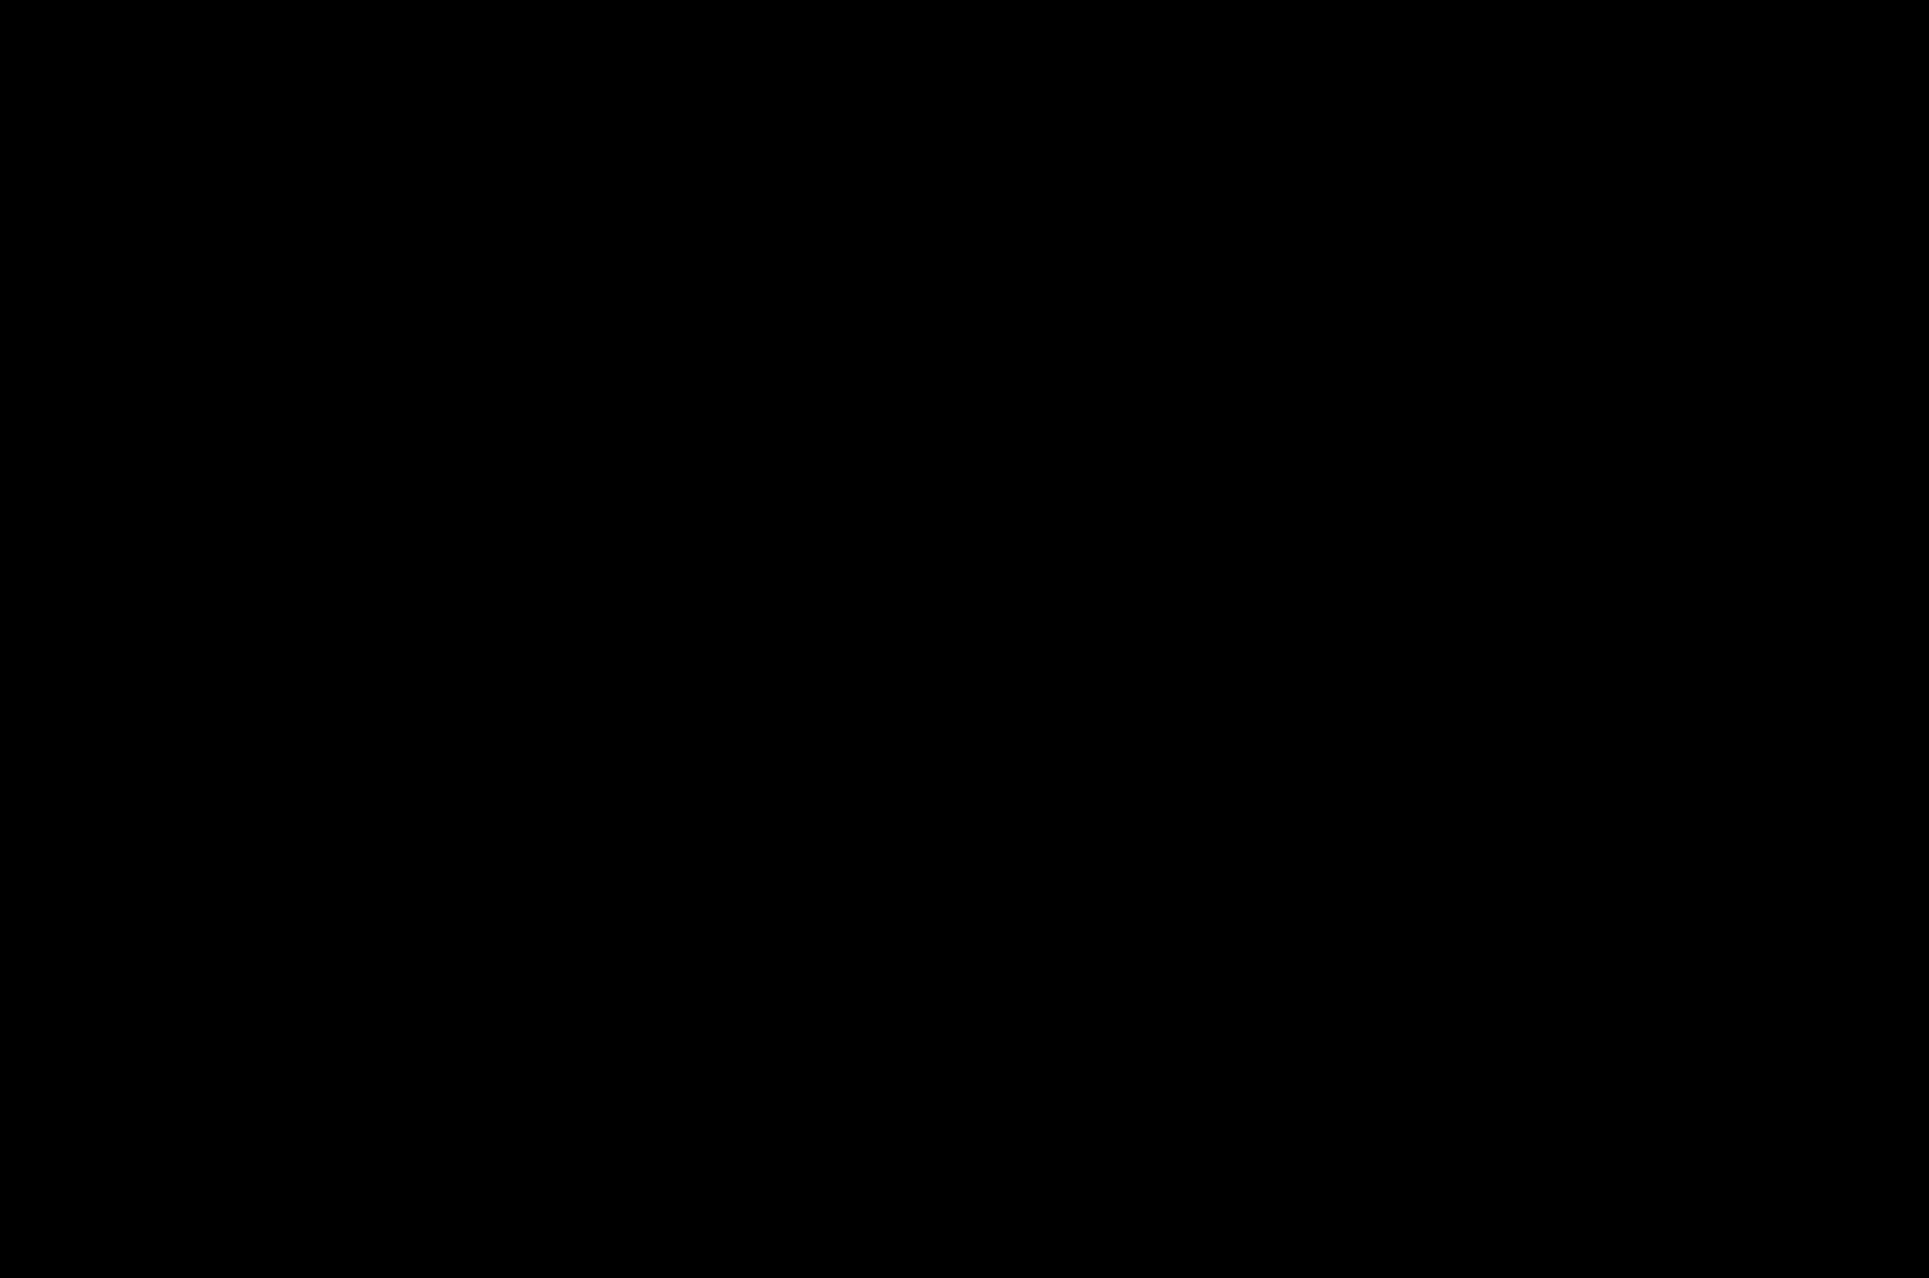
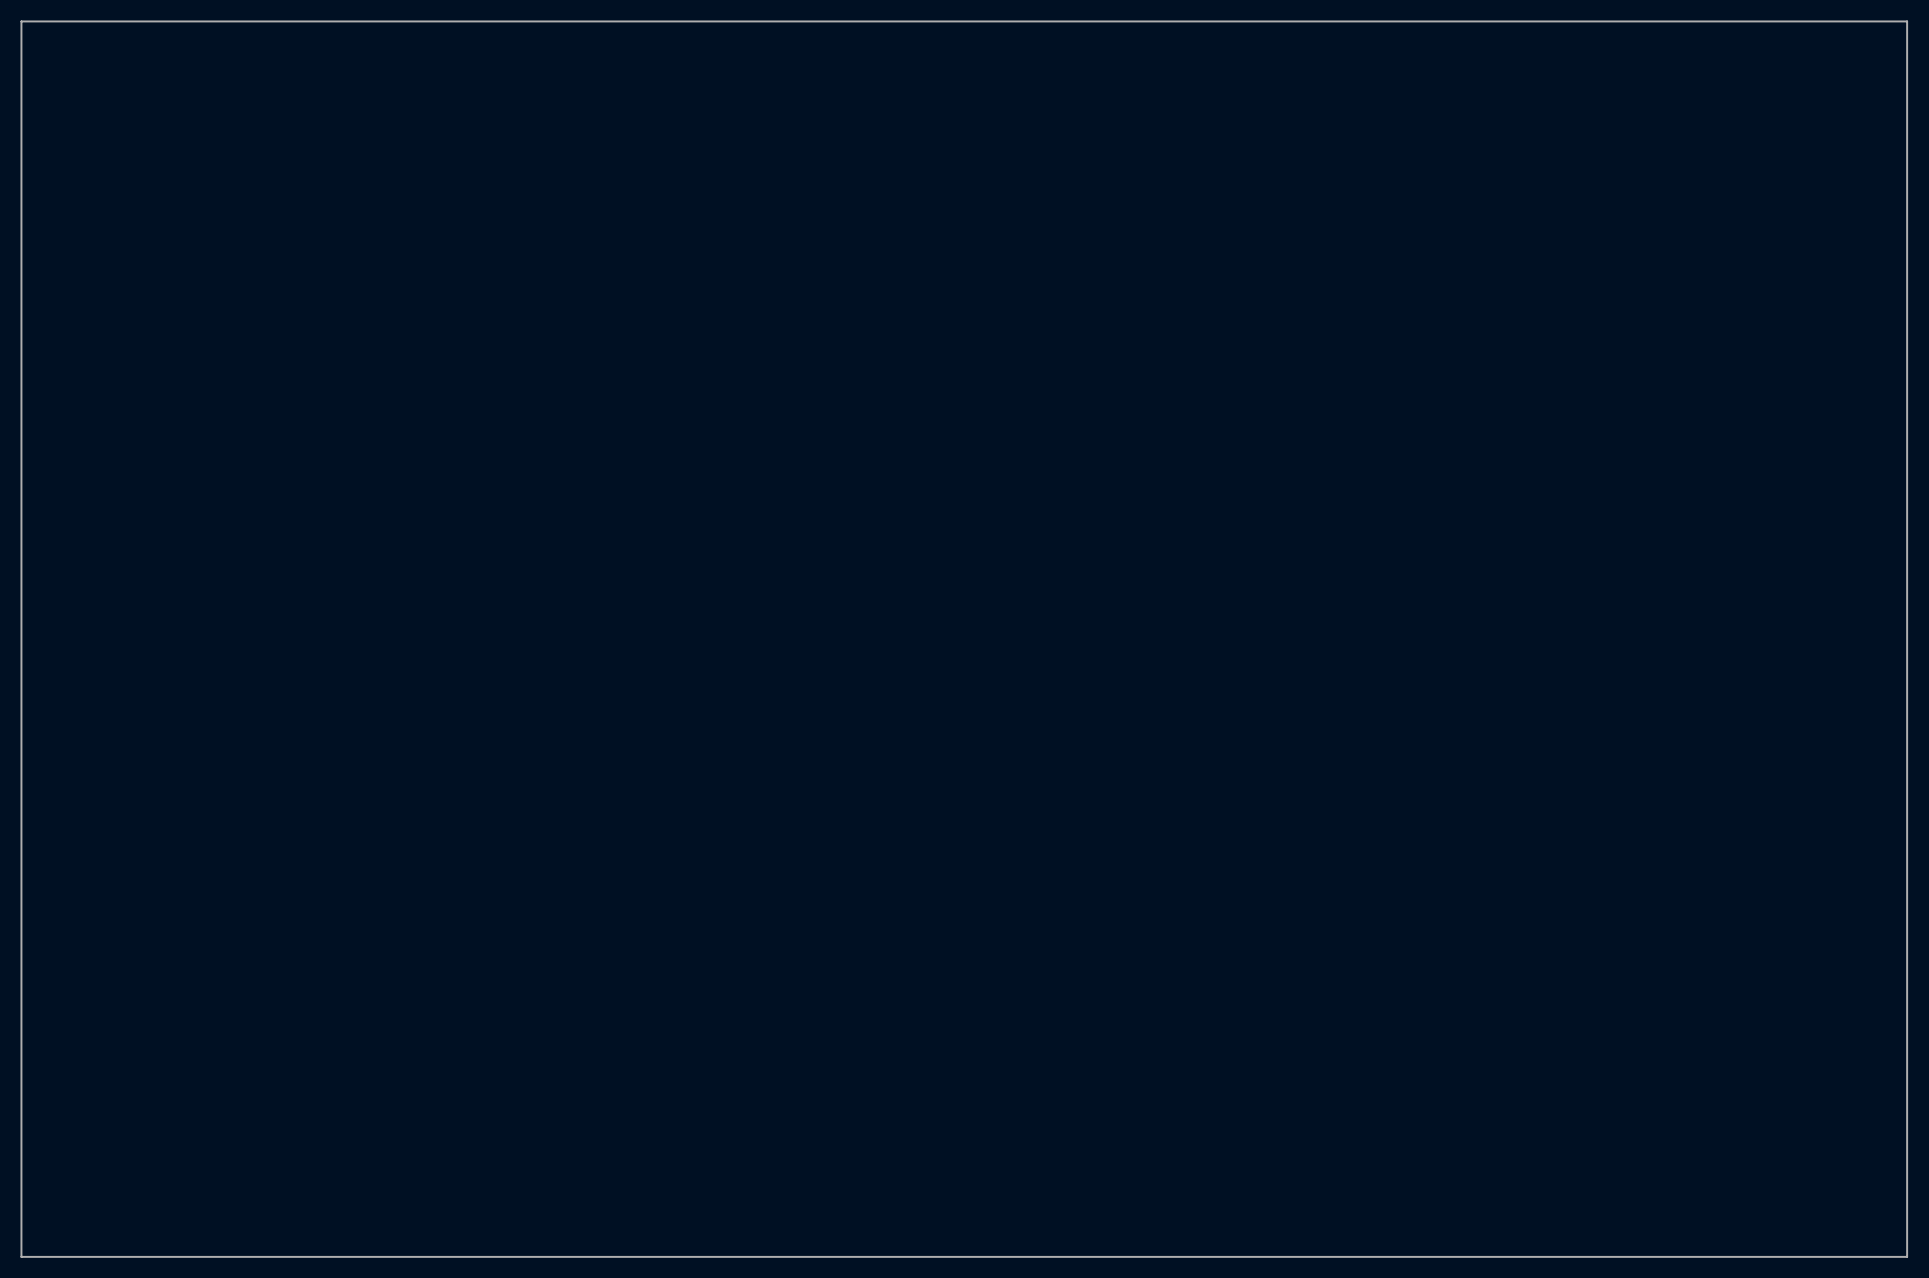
line: none -> (21, 21) (1907, 21) (1907, 1256) (21, 1256) (21, 21)

